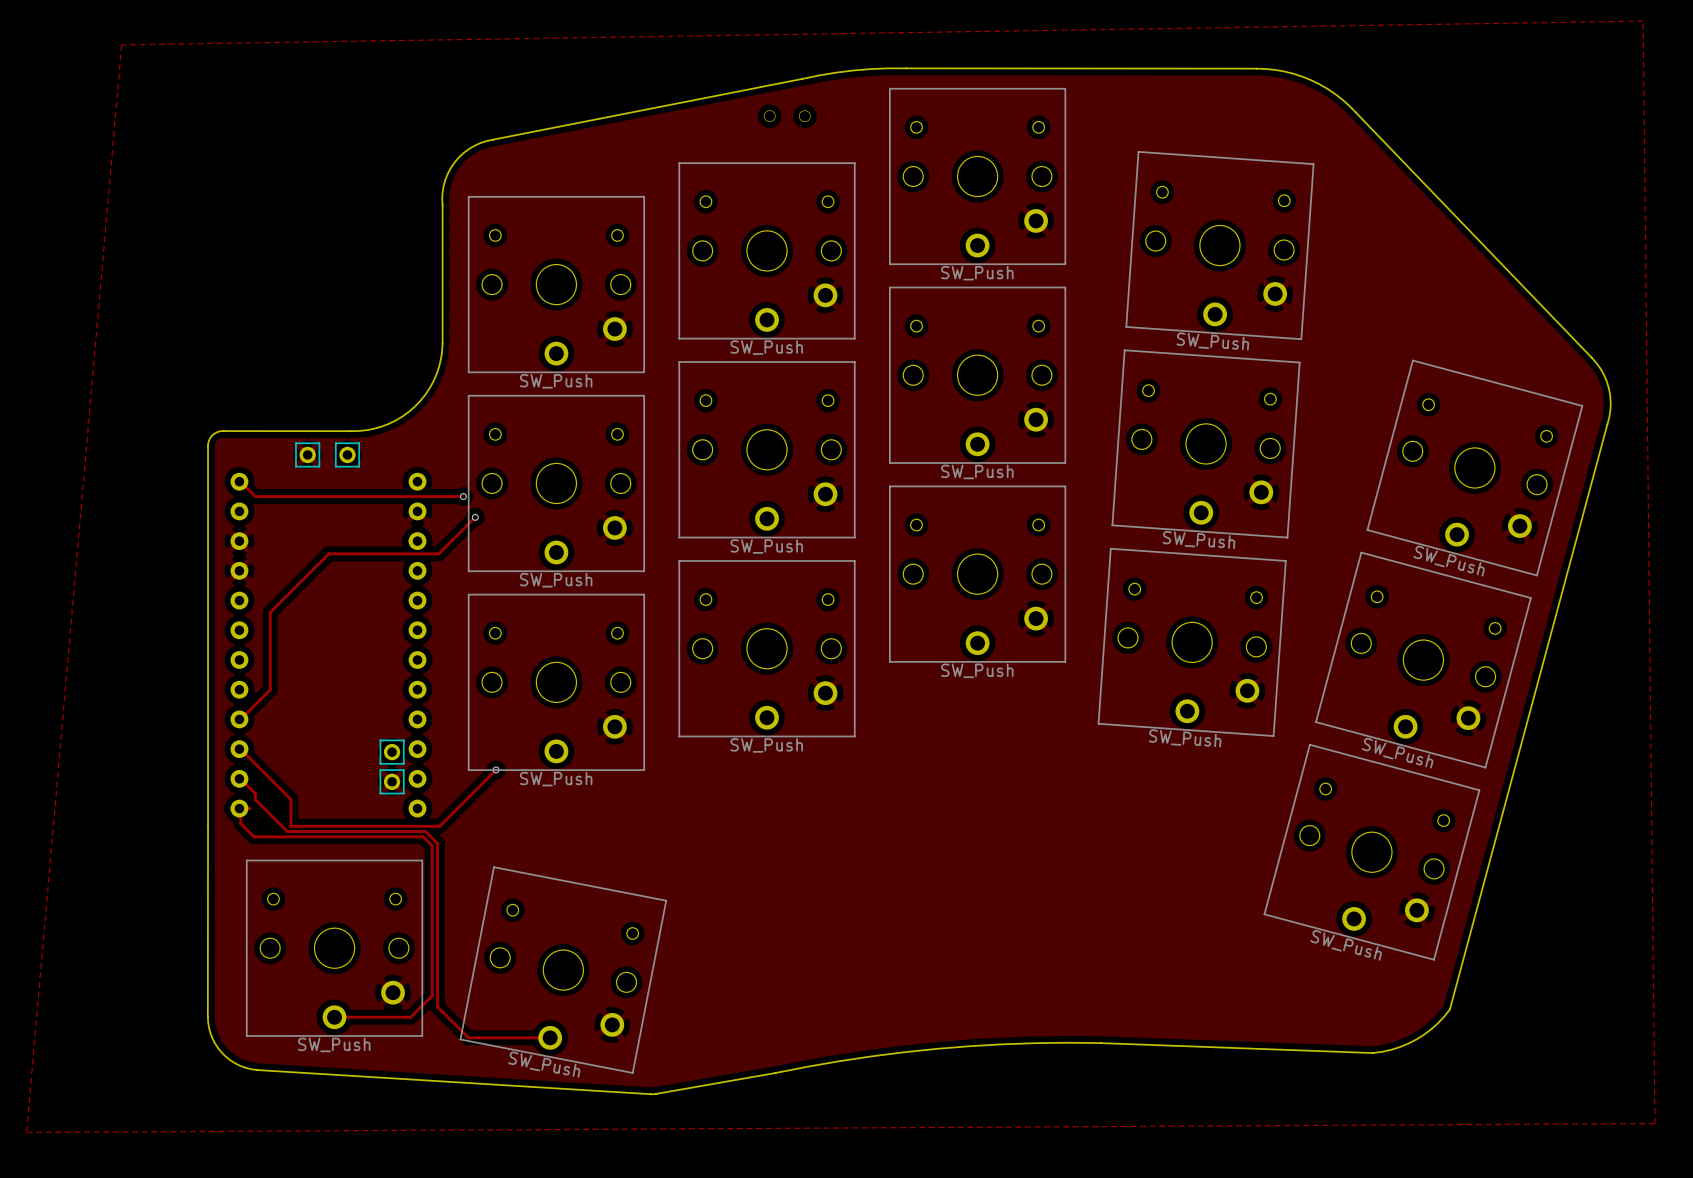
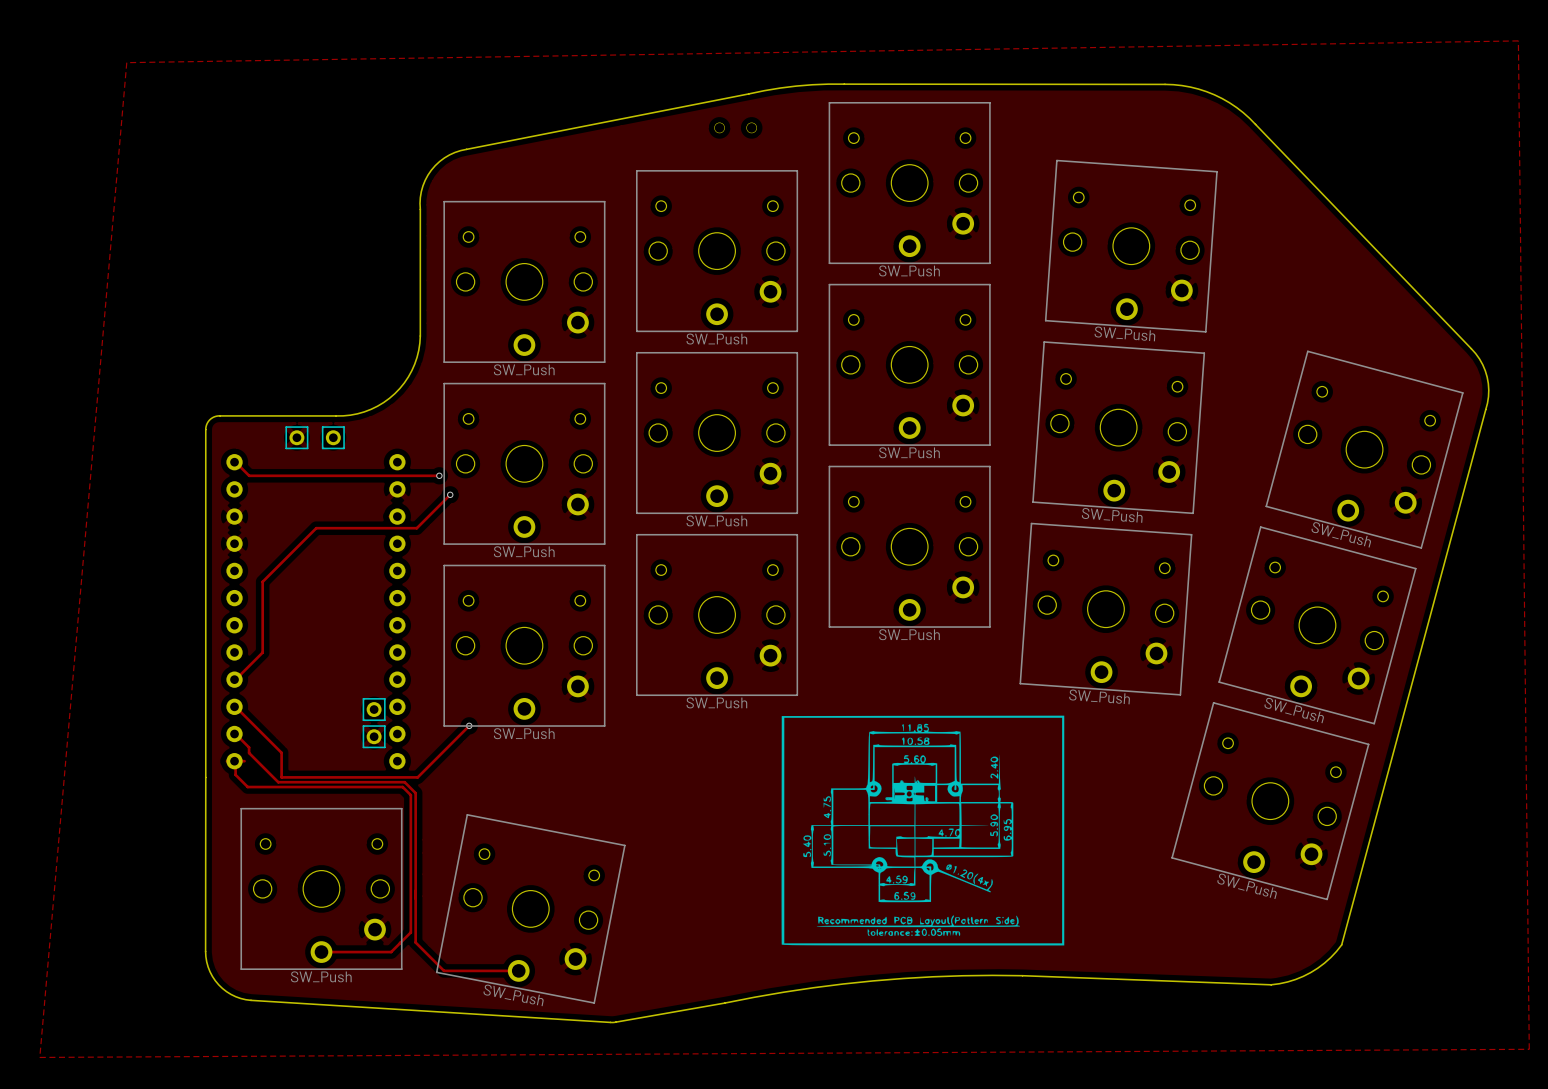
drawing: none -> [781, 715, 1065, 946]

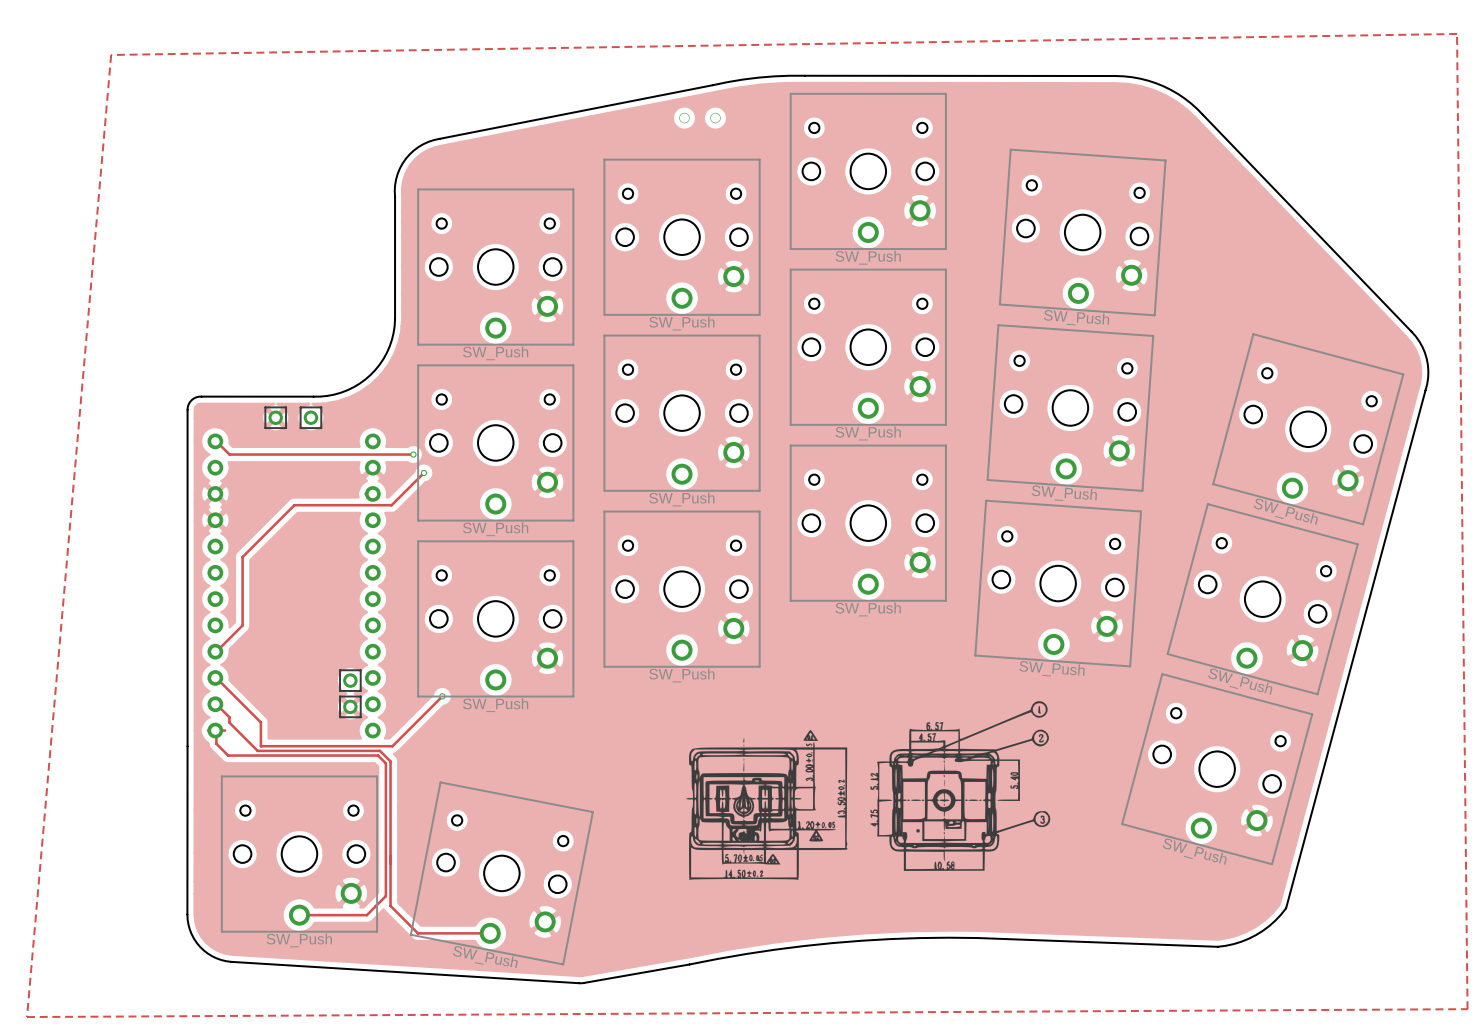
drawing: [781, 715, 1065, 946] -> none
drawing: none -> [870, 701, 1051, 871]
drawing: none -> [686, 729, 848, 881]

